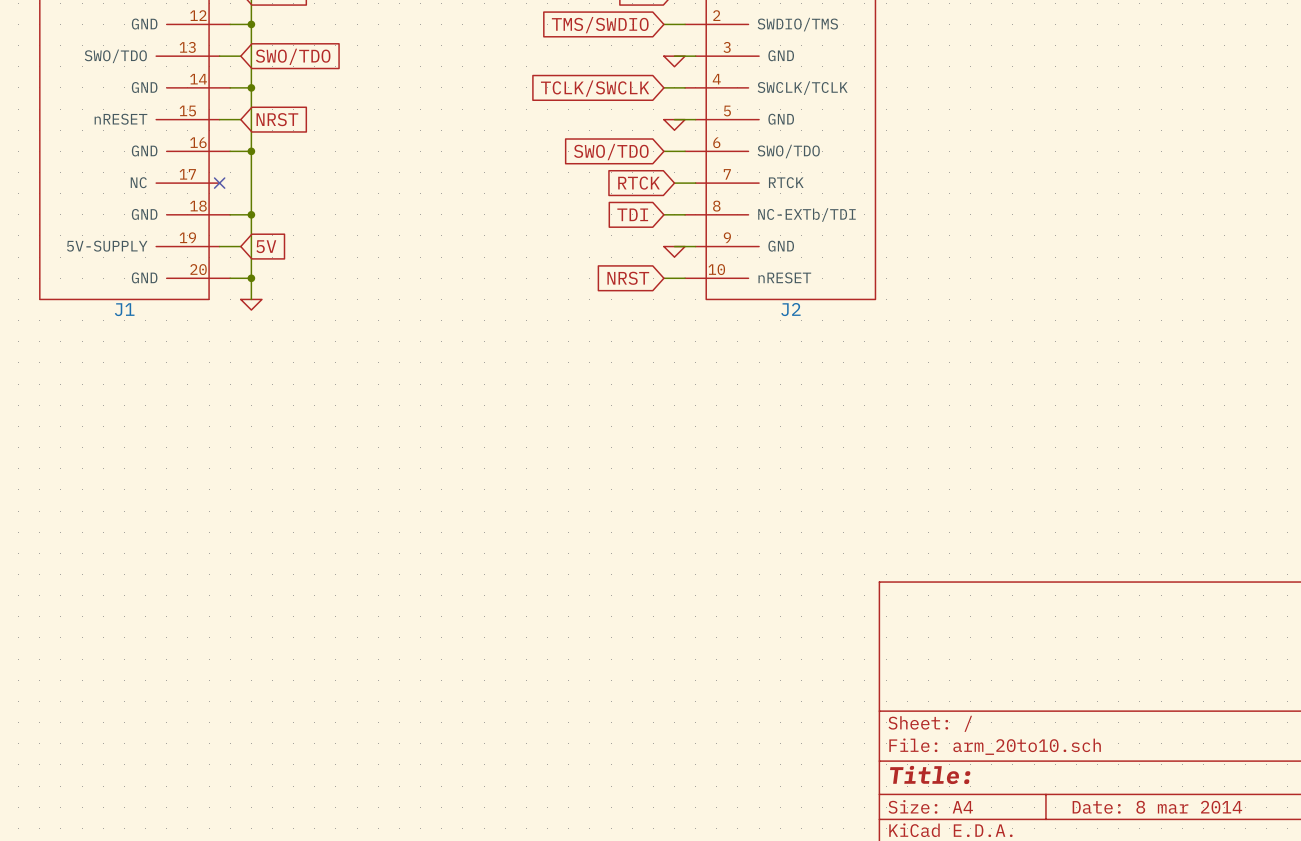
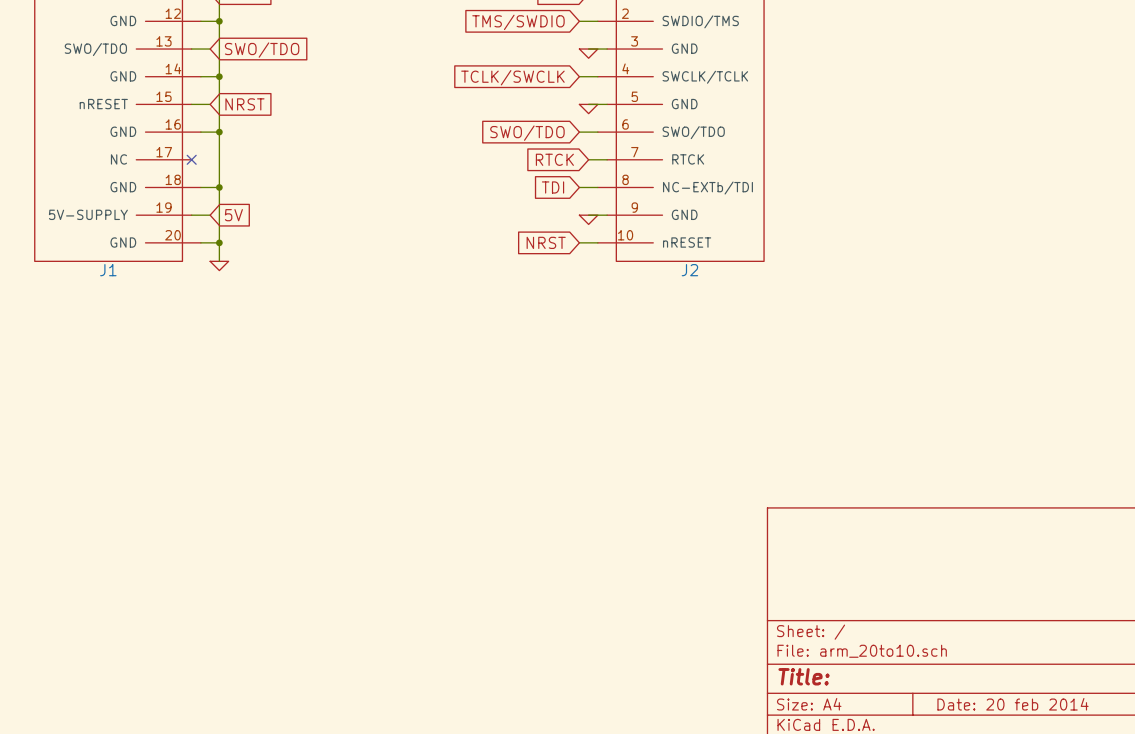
title block: Date: 8 mar 2014 (1157, 807) -> Date: 20 feb 2014 (1013, 704)

